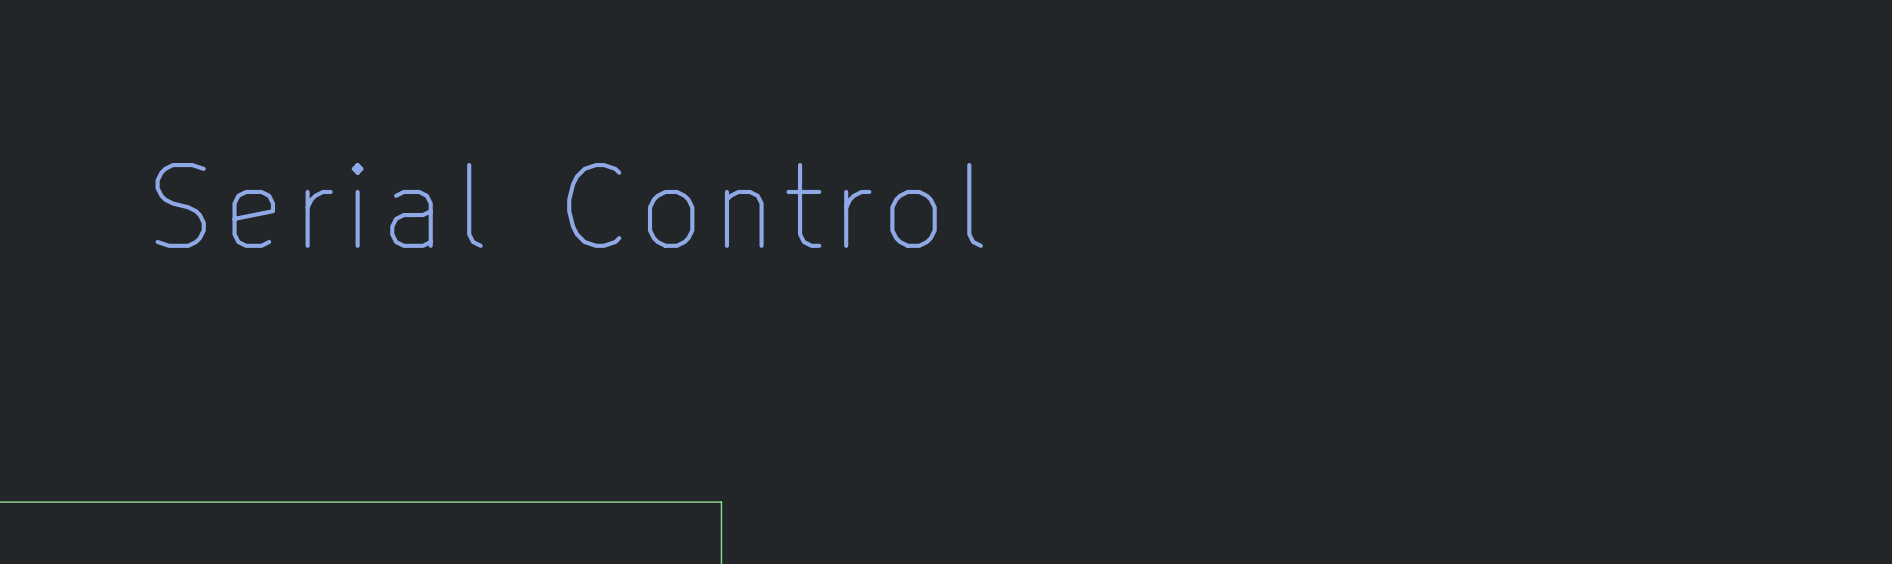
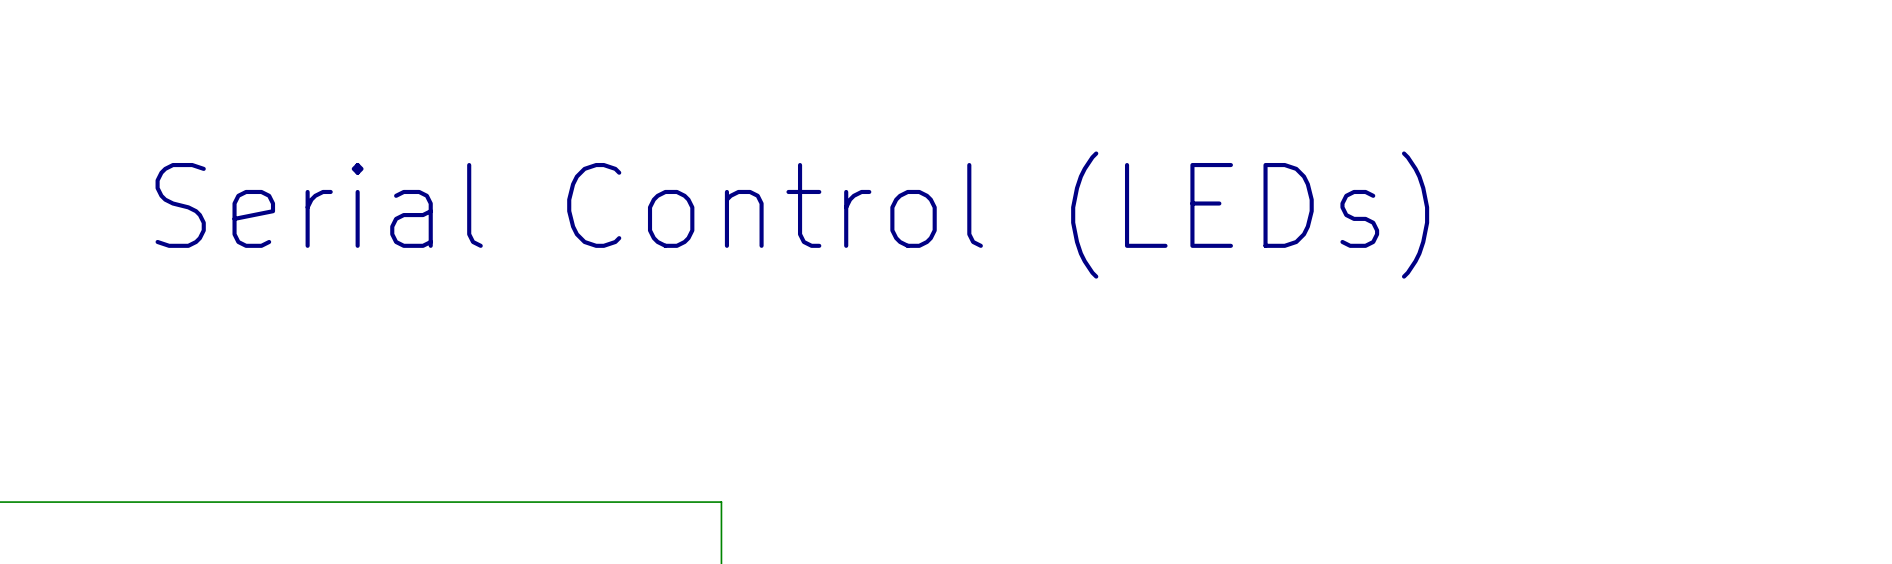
text: Serial Control (569, 205) -> Serial Control (LEDs) (792, 215)

